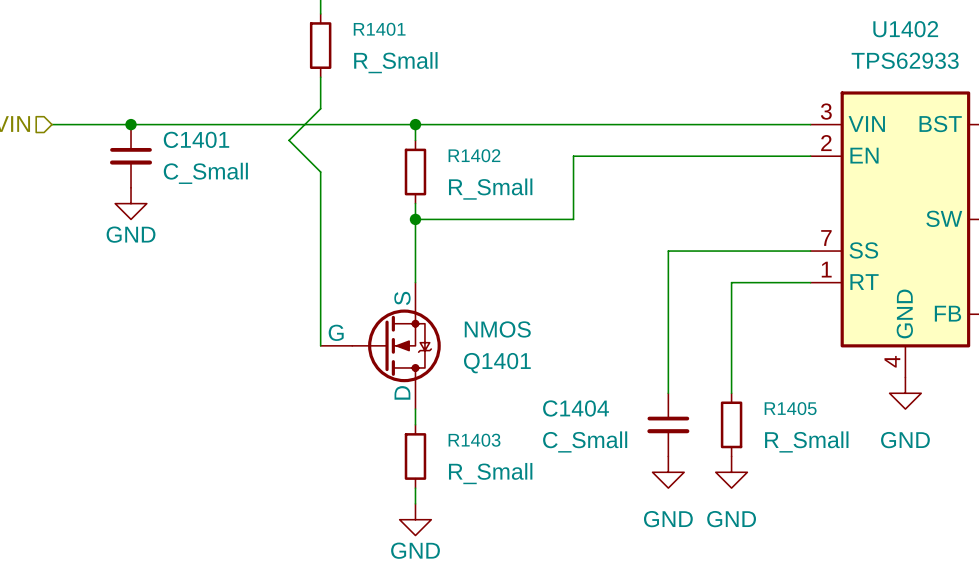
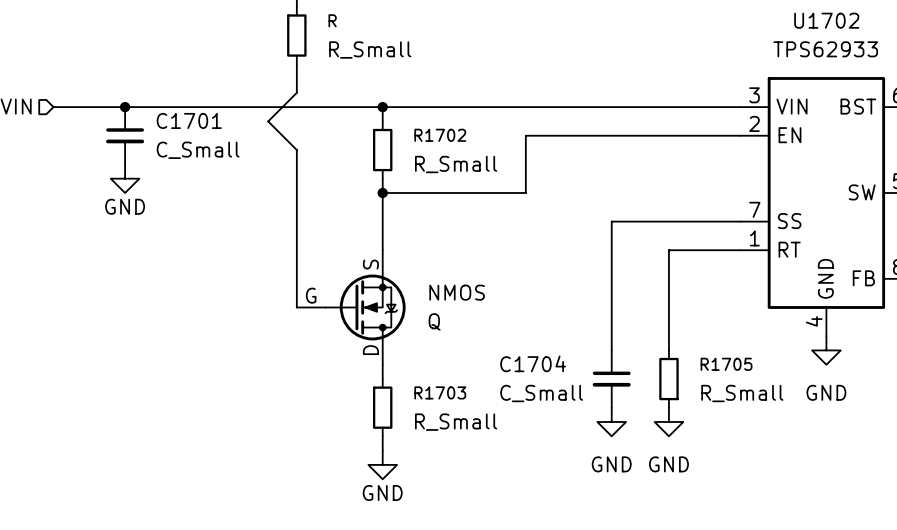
R1401 name: R1401 (379, 29) -> R (332, 20)
U1402 name: U1402 (905, 29) -> U1702 (826, 20)
C1401 name: C1401 (196, 139) -> C1701 (189, 120)
R1402 name: R1402 (474, 155) -> R1702 (440, 135)
Q1401 name: Q1401 (497, 363) -> Q (434, 321)
C1404 name: C1404 (576, 408) -> C1704 (533, 363)
R1405 name: R1405 (790, 408) -> R1705 (726, 364)
R1403 name: R1403 (474, 440) -> R1703 (440, 392)

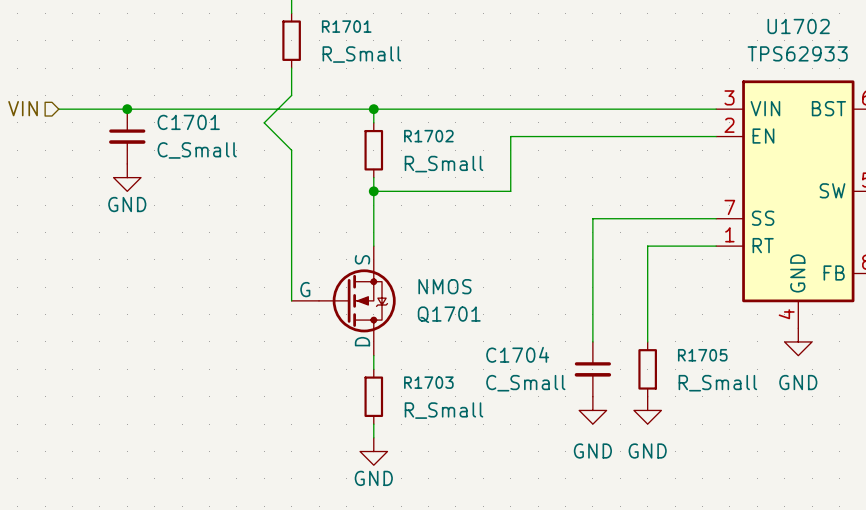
R name: R (332, 20) -> R1701 (346, 26)
Q name: Q (434, 321) -> Q1701 (449, 314)

